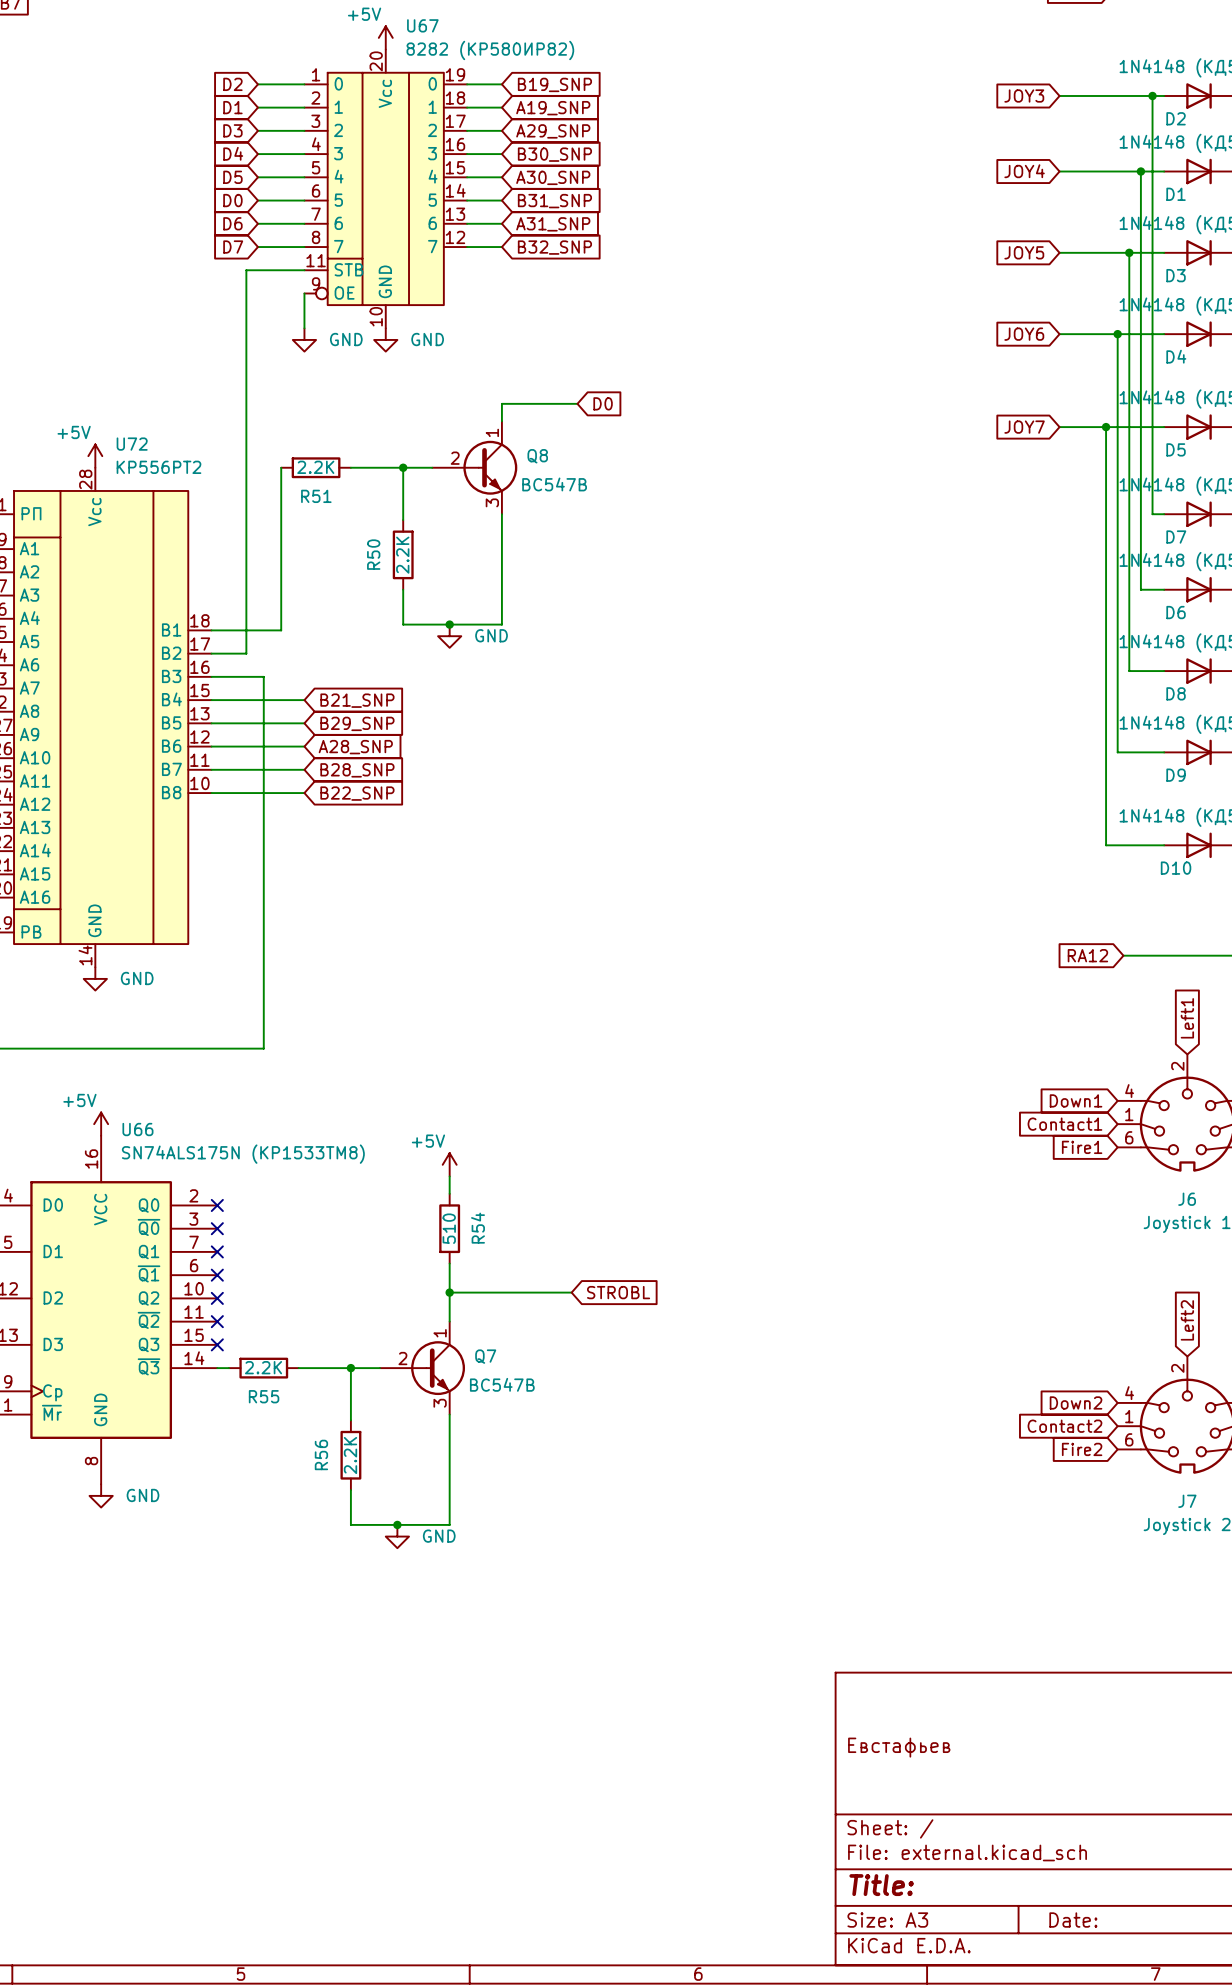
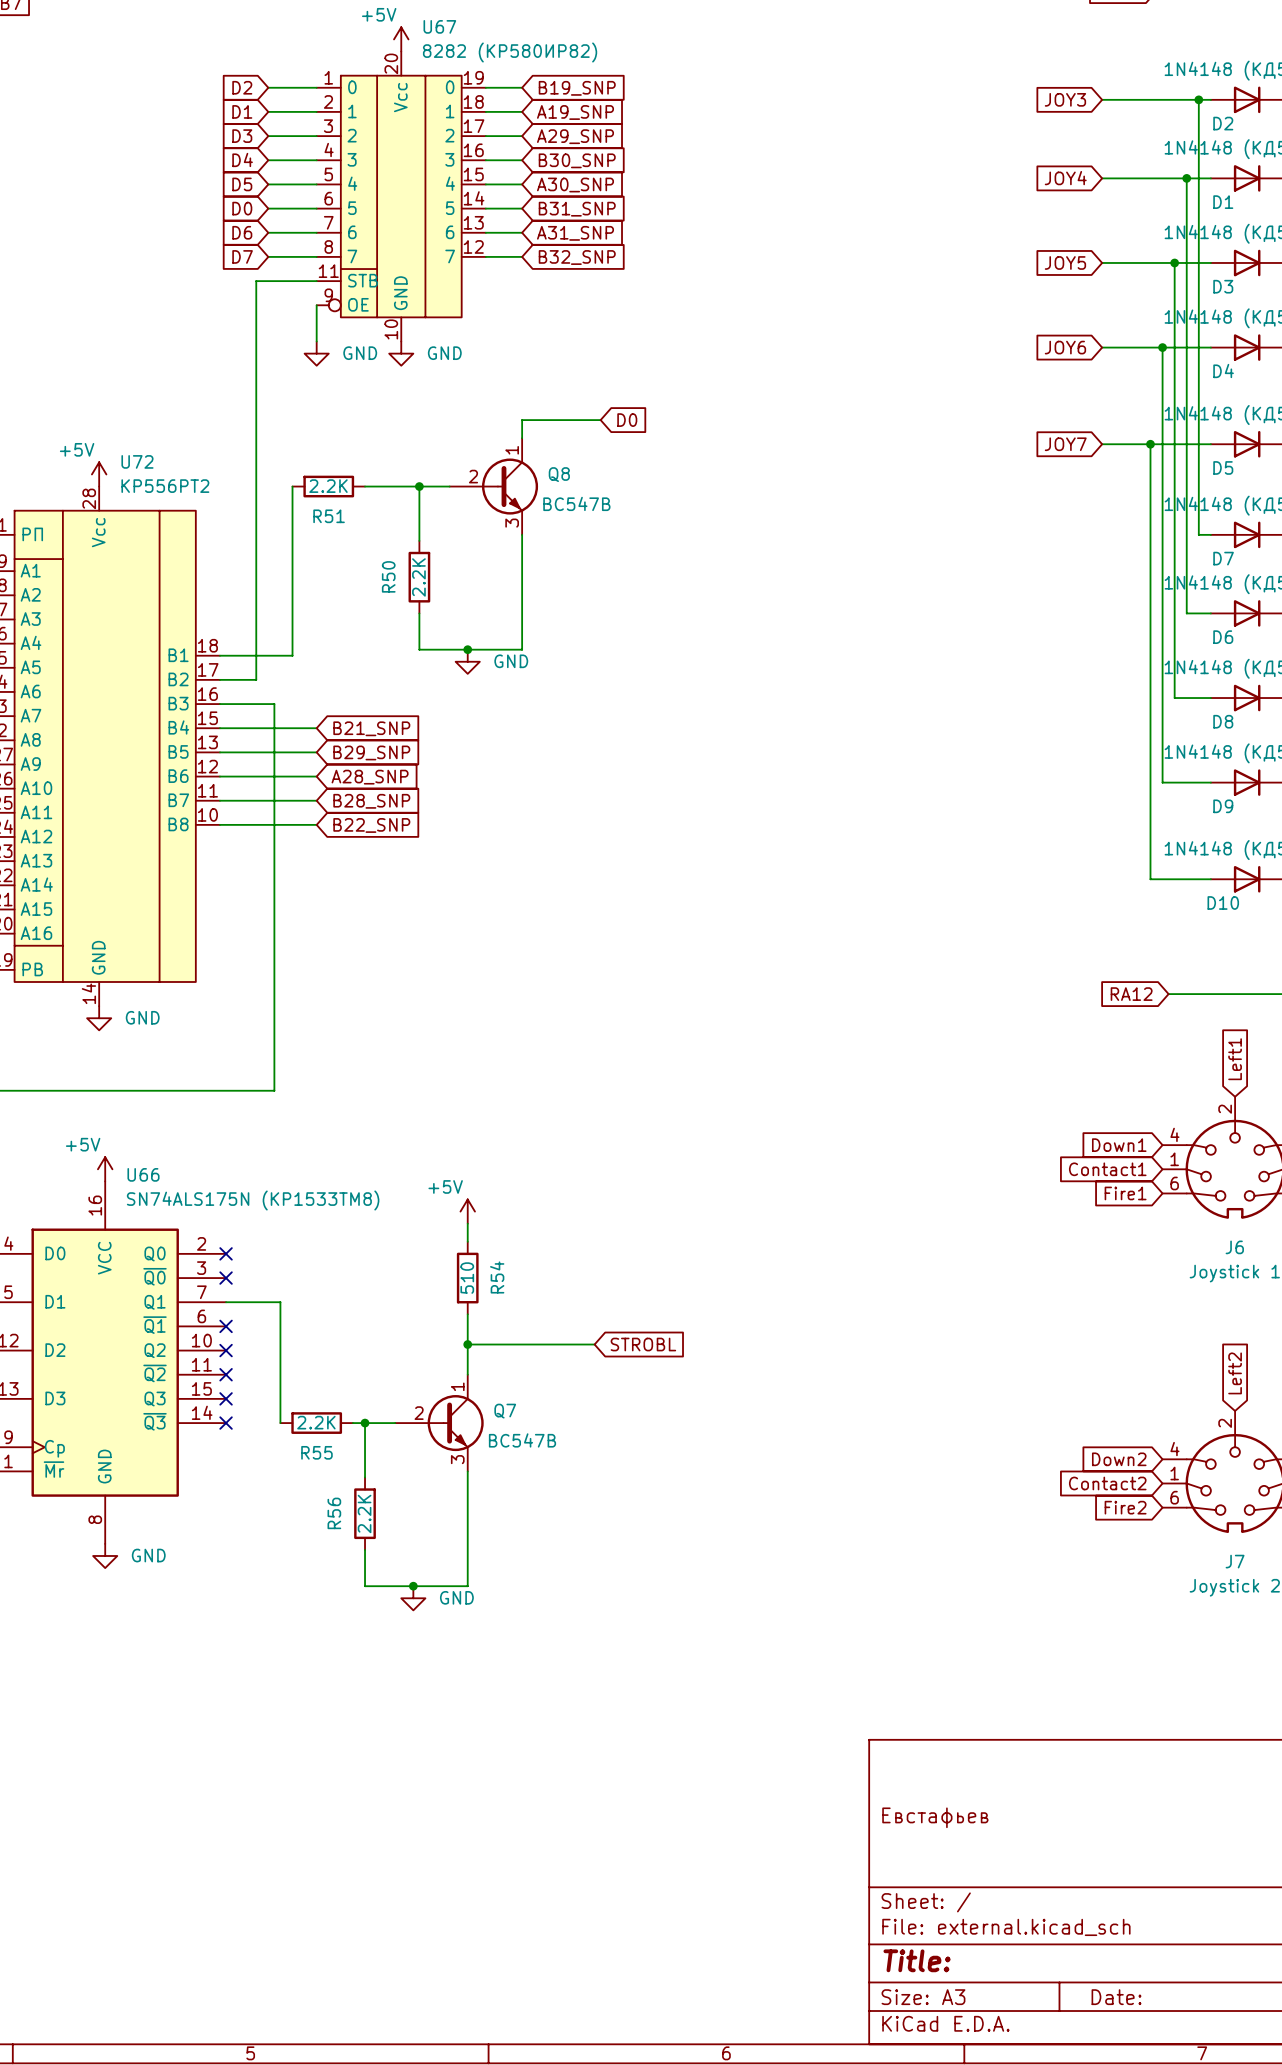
wire: none -> (226, 1302) (280, 1302) (280, 1423)
no-connect mark: (217, 1251) -> none
wire: (217, 1368) (228, 1368) -> none
no-connect mark: none -> (226, 1423)
R55 position: (263, 1368) -> (316, 1423)
wire: (298, 1368) (339, 1368) -> none

